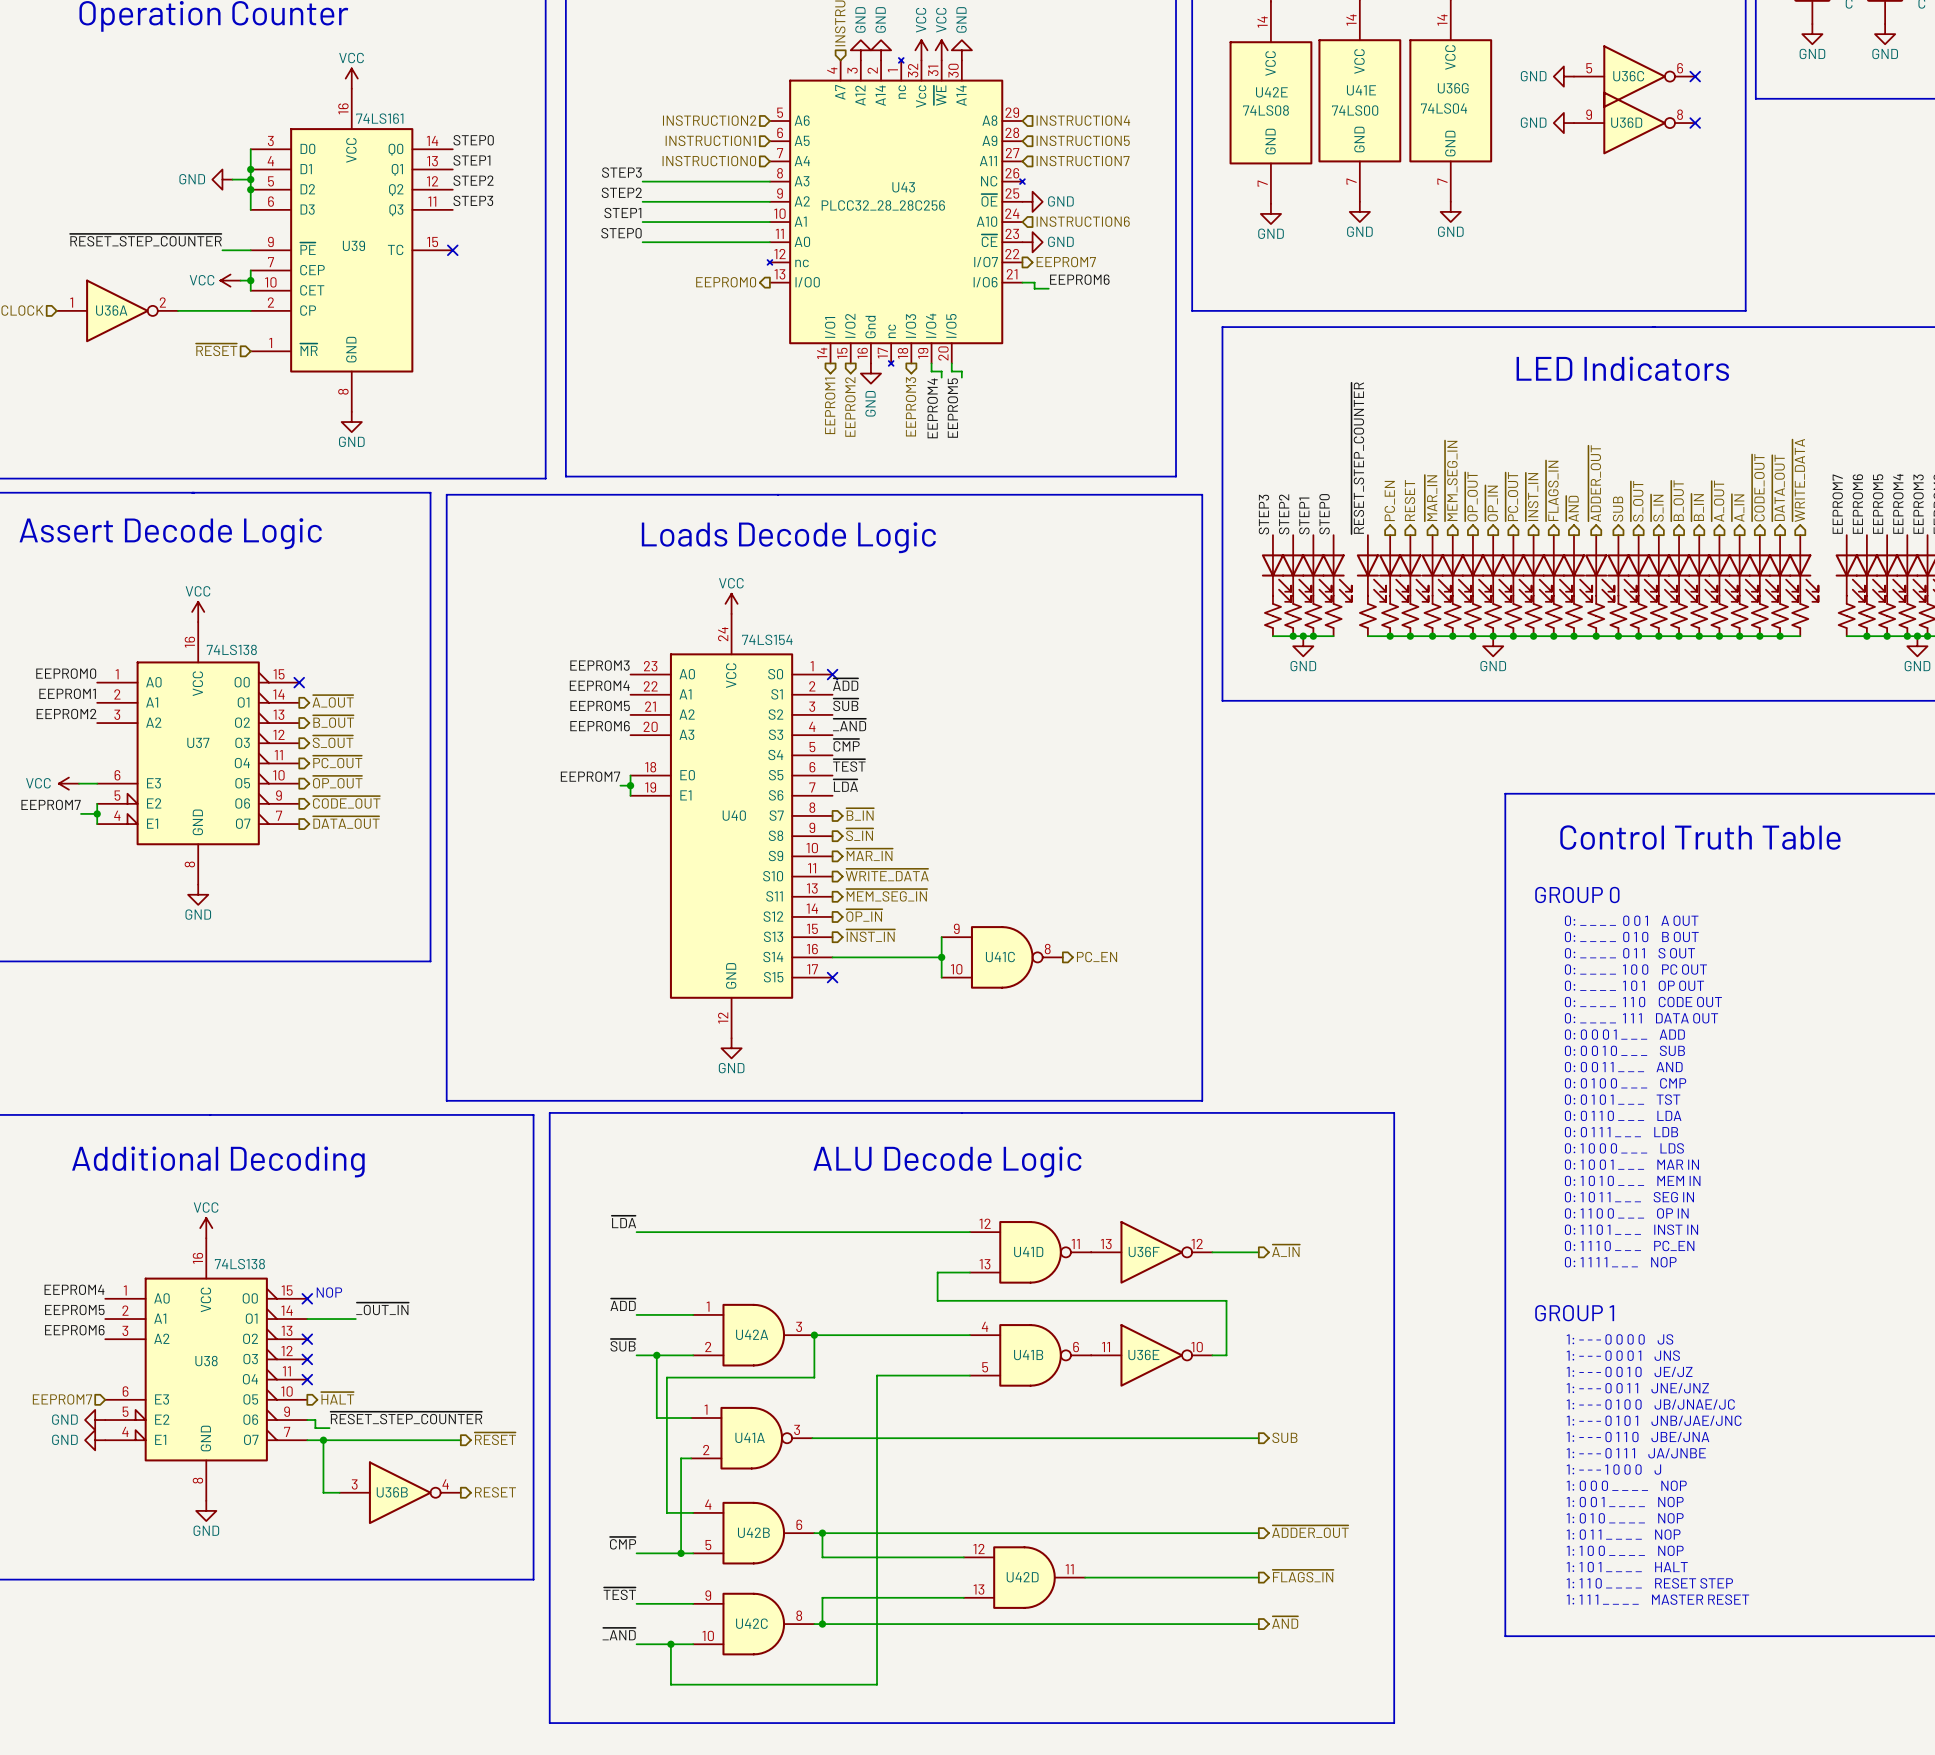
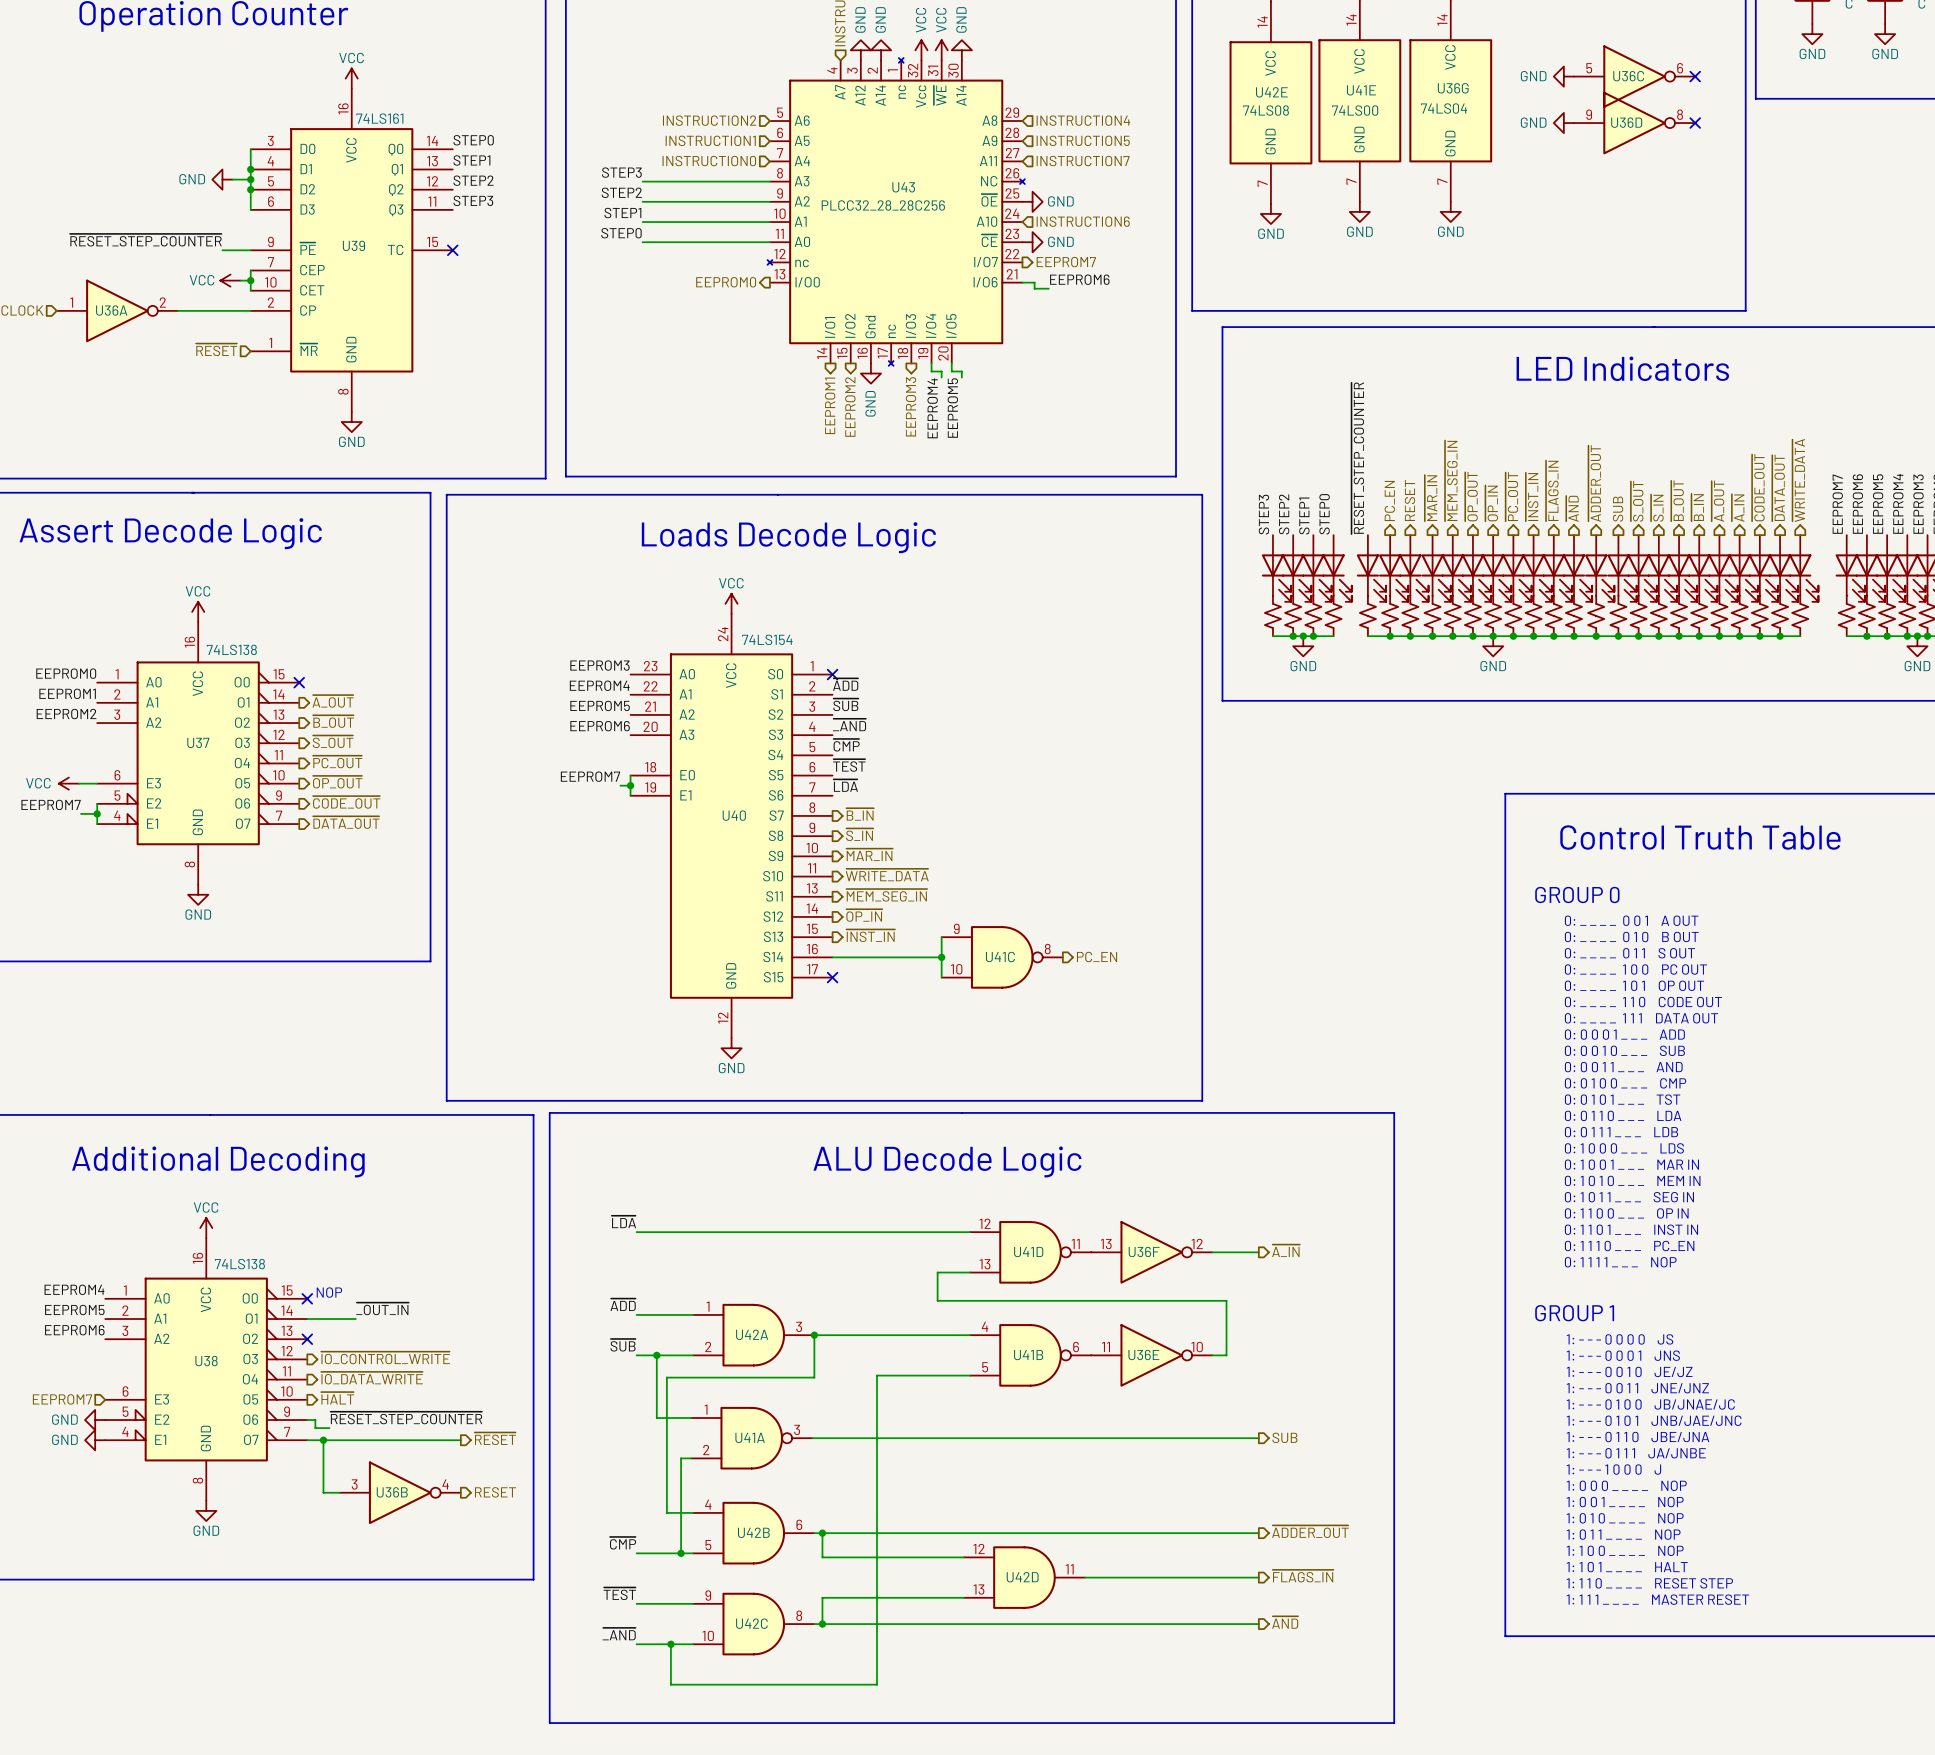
hierarchical label: none -> ~{IO_CONTROL_WRITE} (385, 1357)
no-connect mark: (307, 1359) -> none
hierarchical label: none -> ~{IO_DATA_WRITE} (371, 1378)
no-connect mark: (307, 1379) -> none

